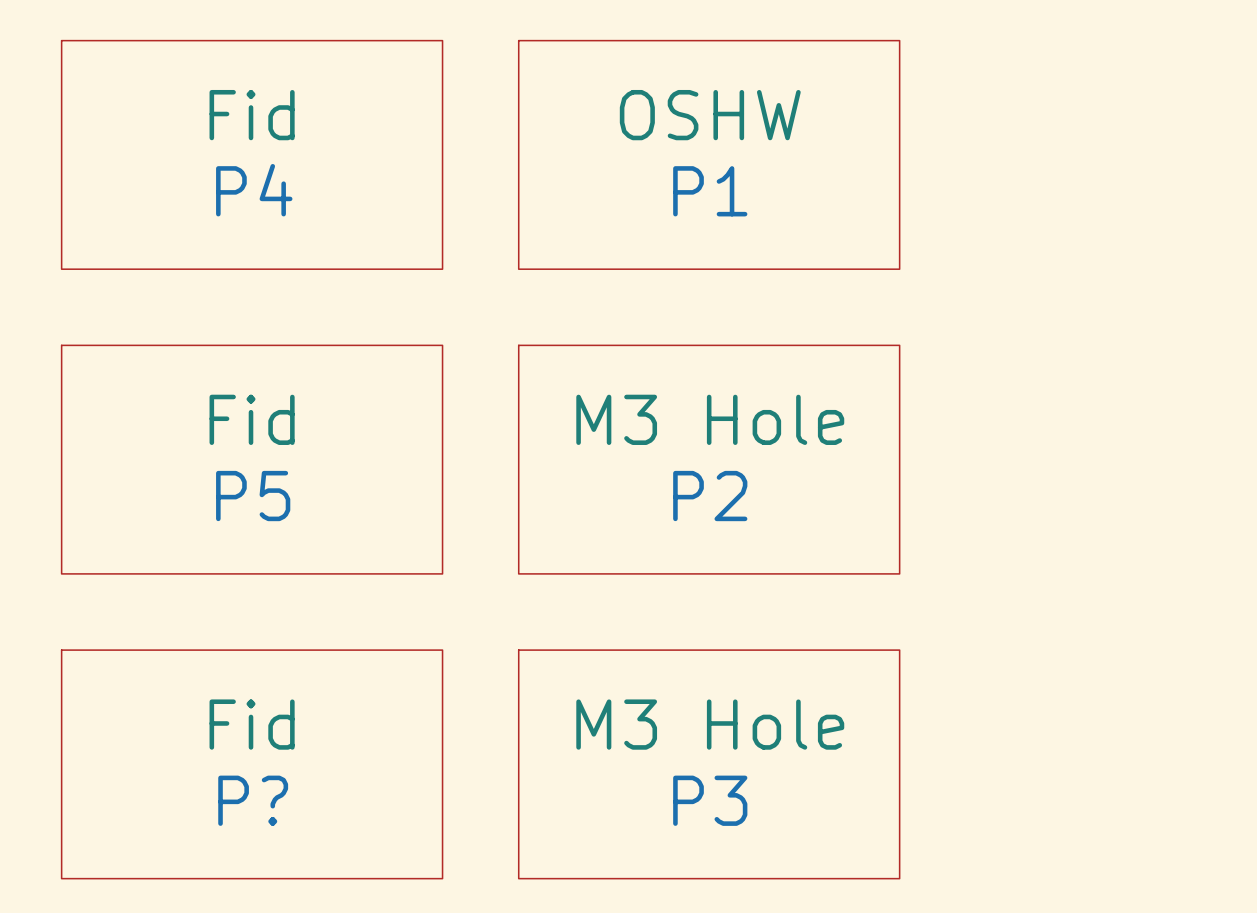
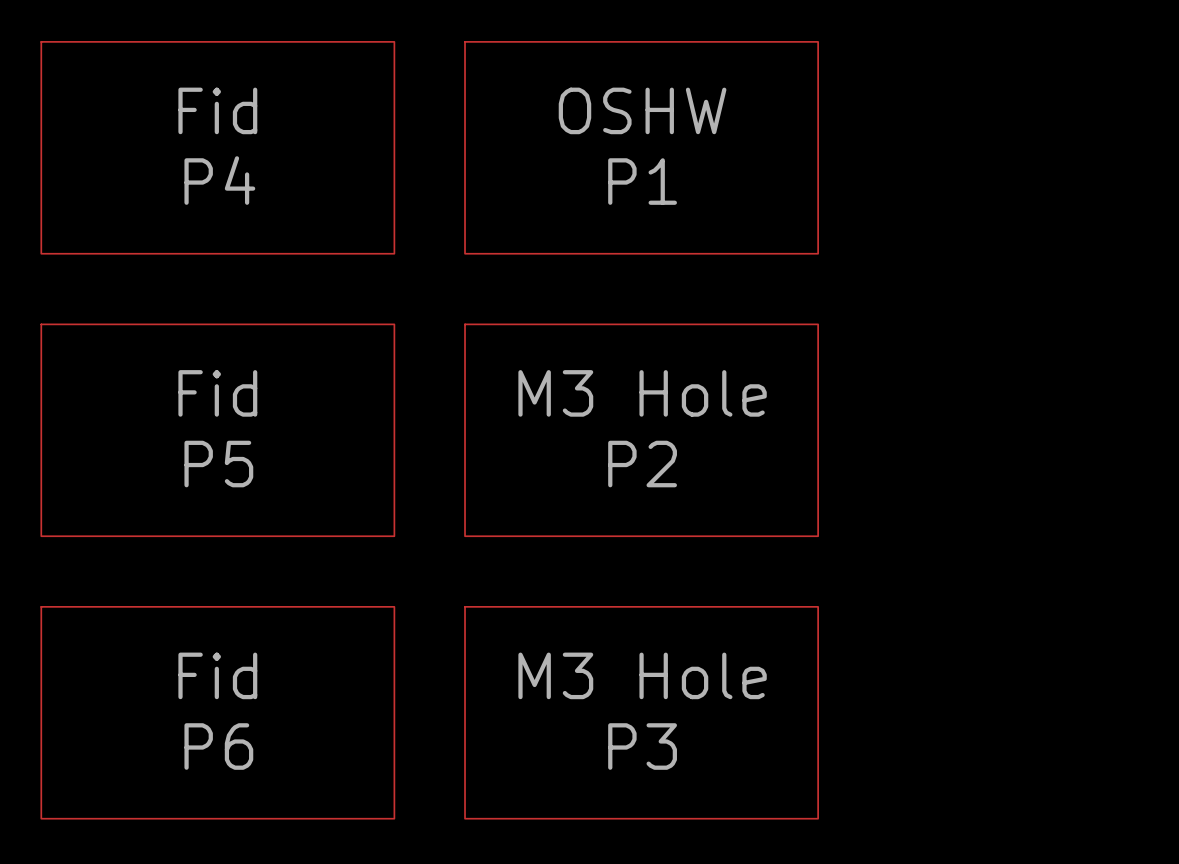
P? name: P? (253, 800) -> P6 (218, 746)

